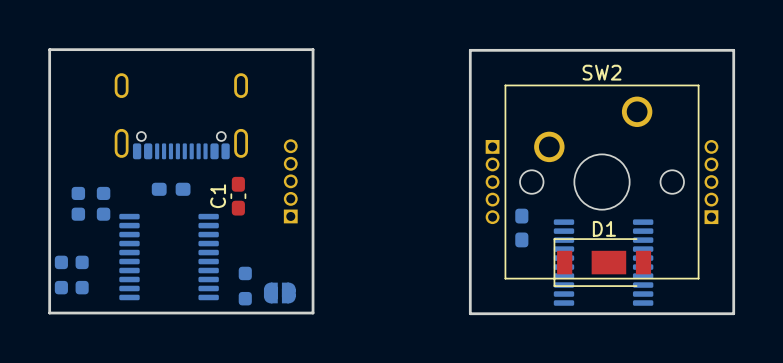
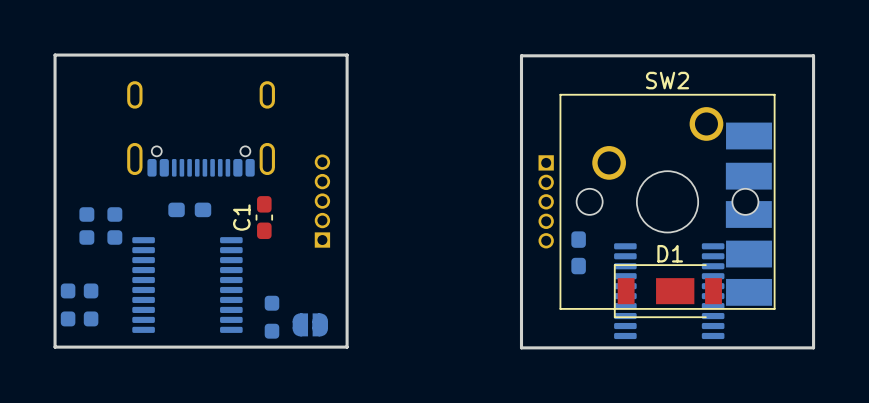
part: (711, 182) -> none
part: none -> (748, 214)

